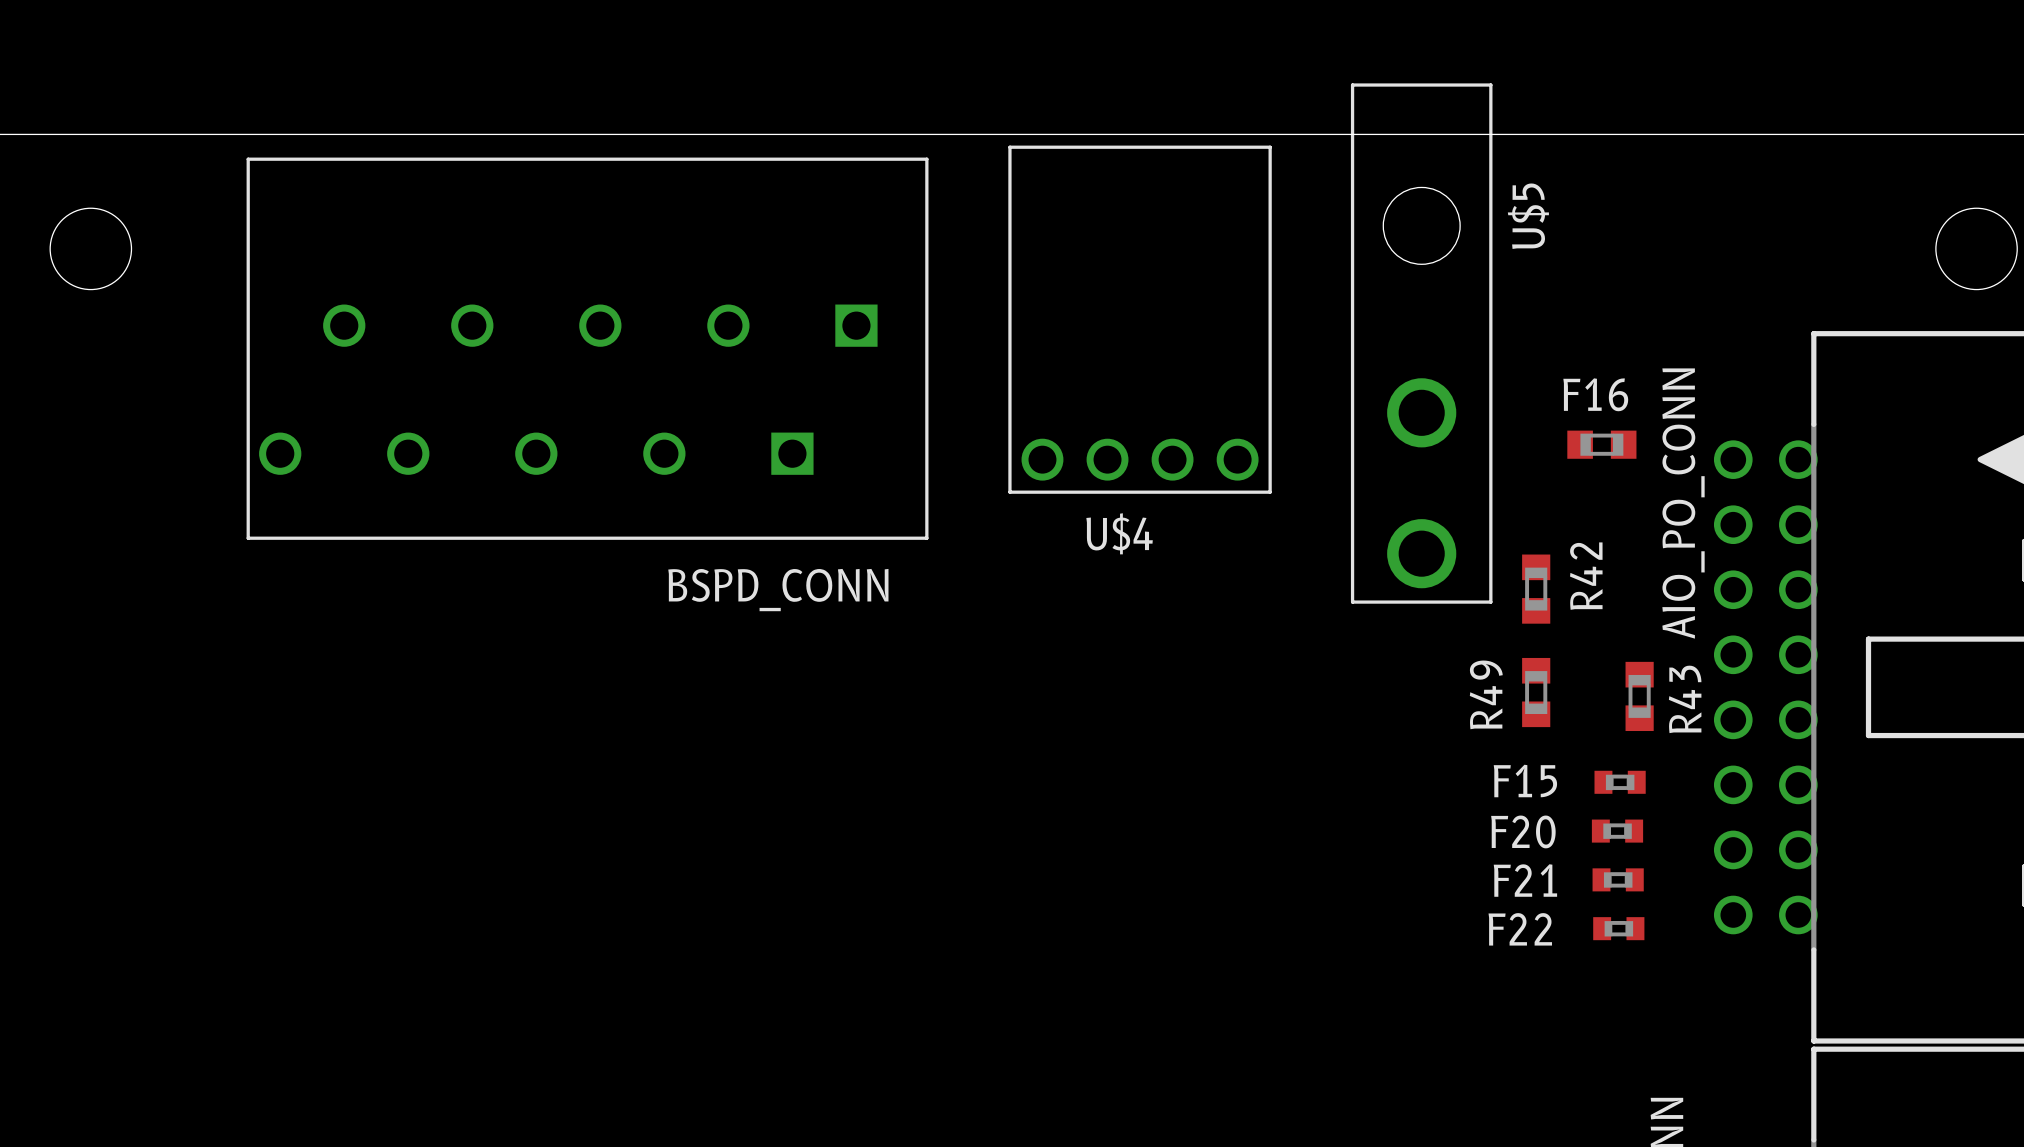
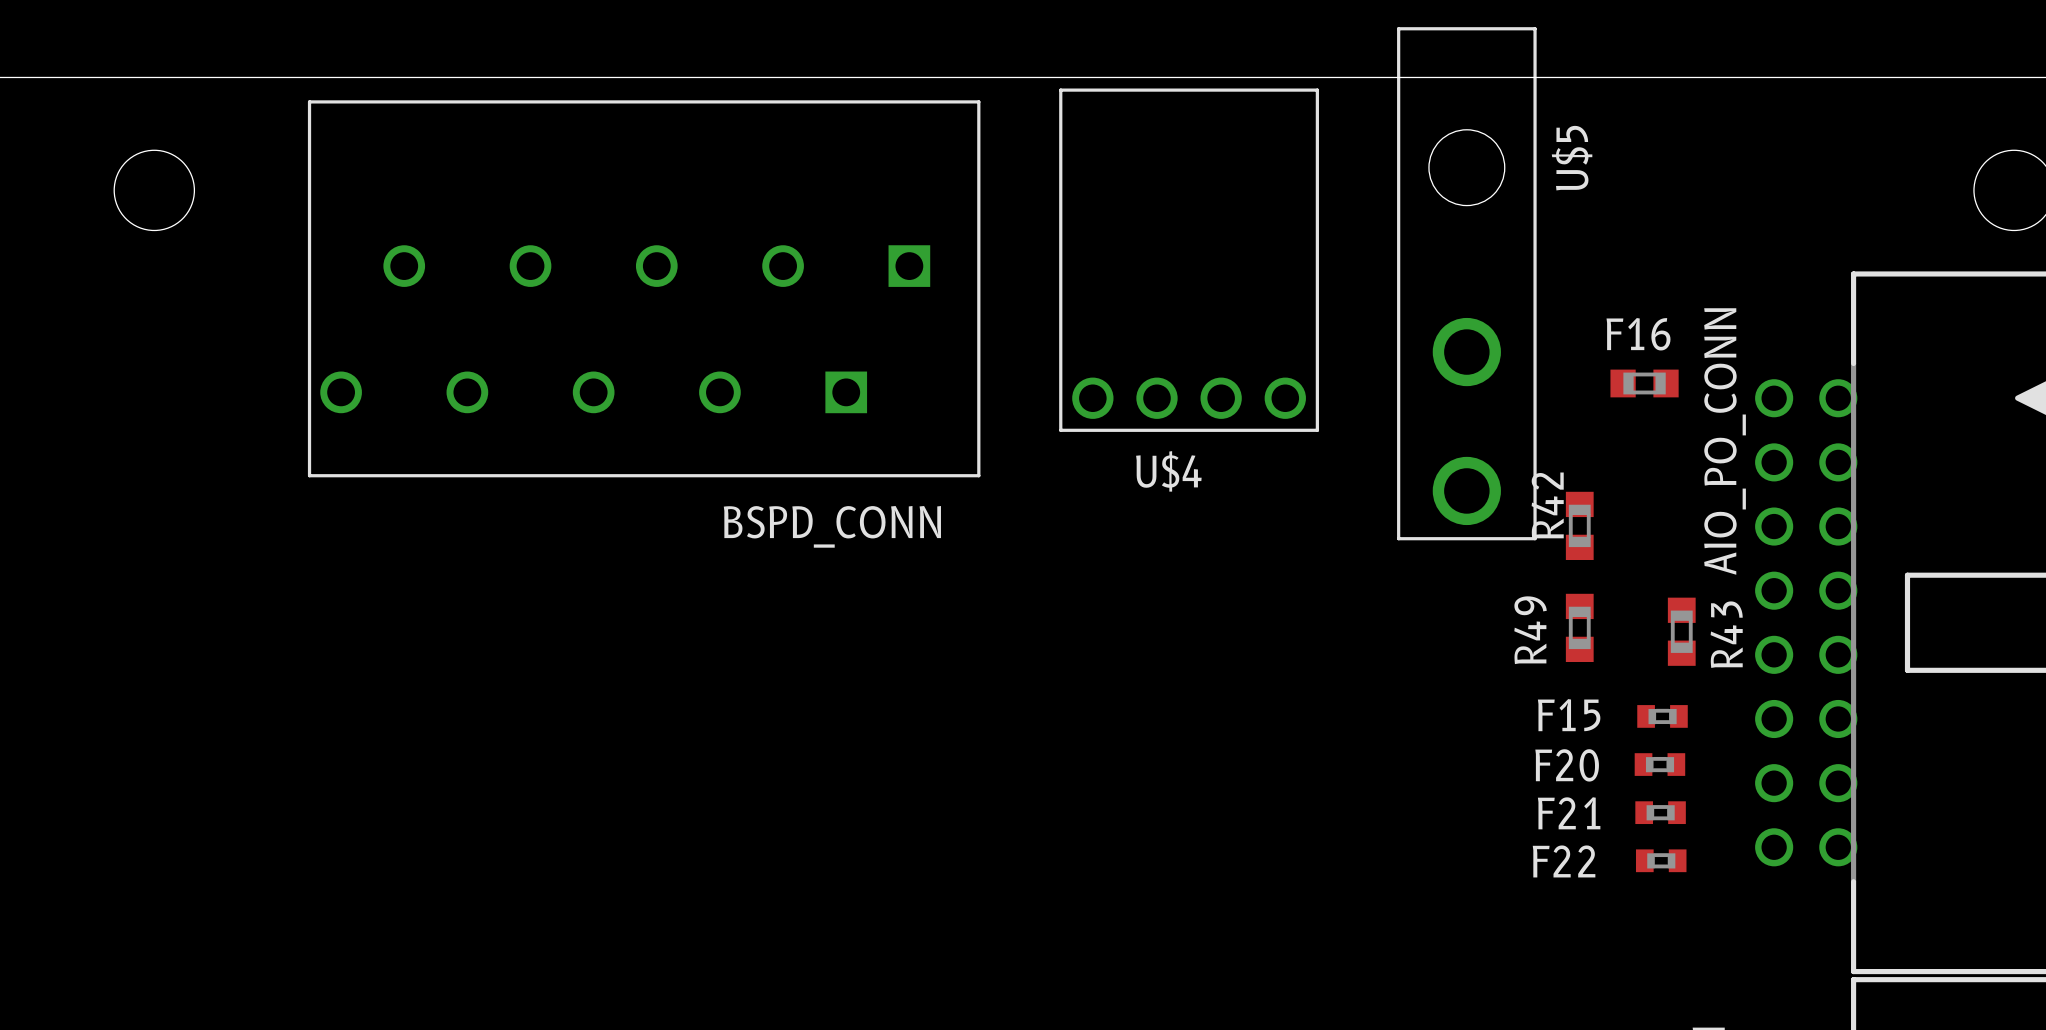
R42 name position: R42 (1586, 576) -> R42 (1547, 505)

